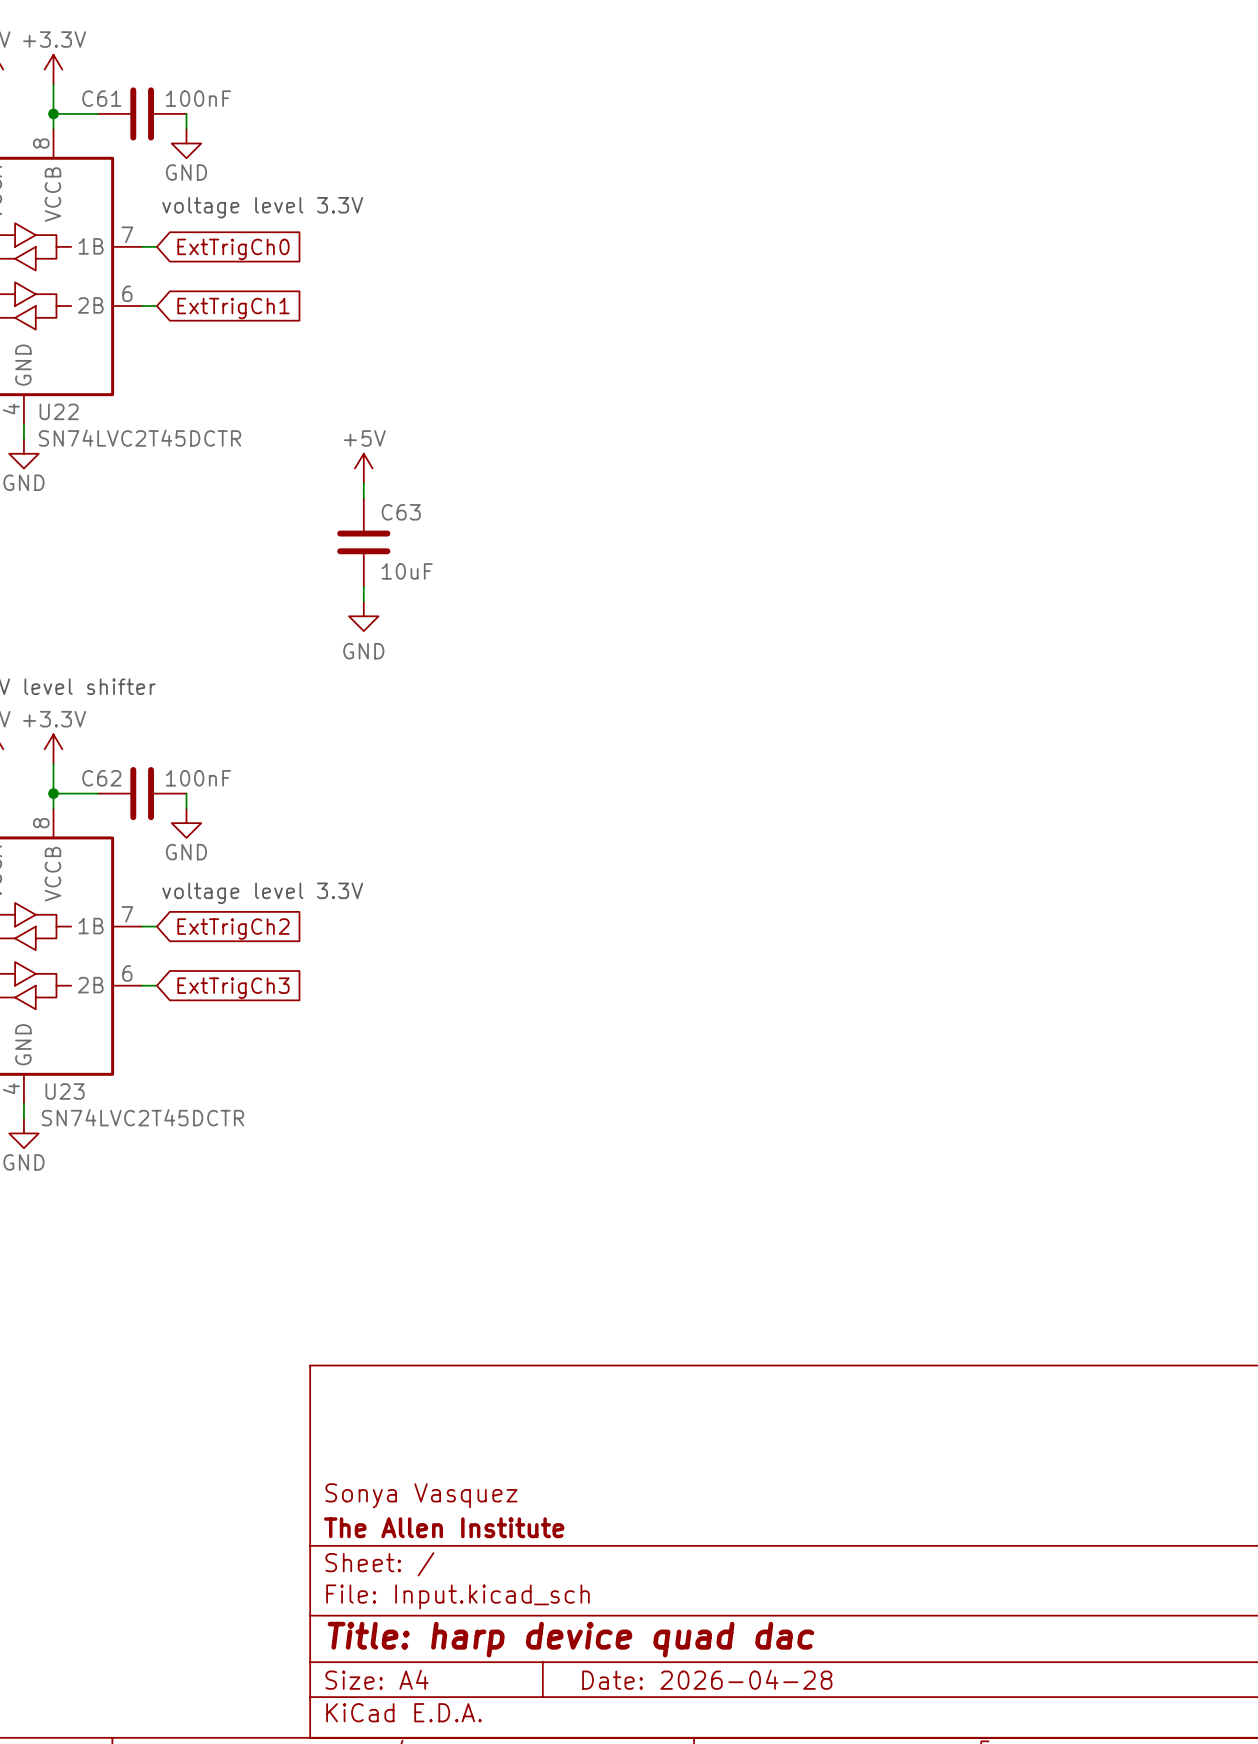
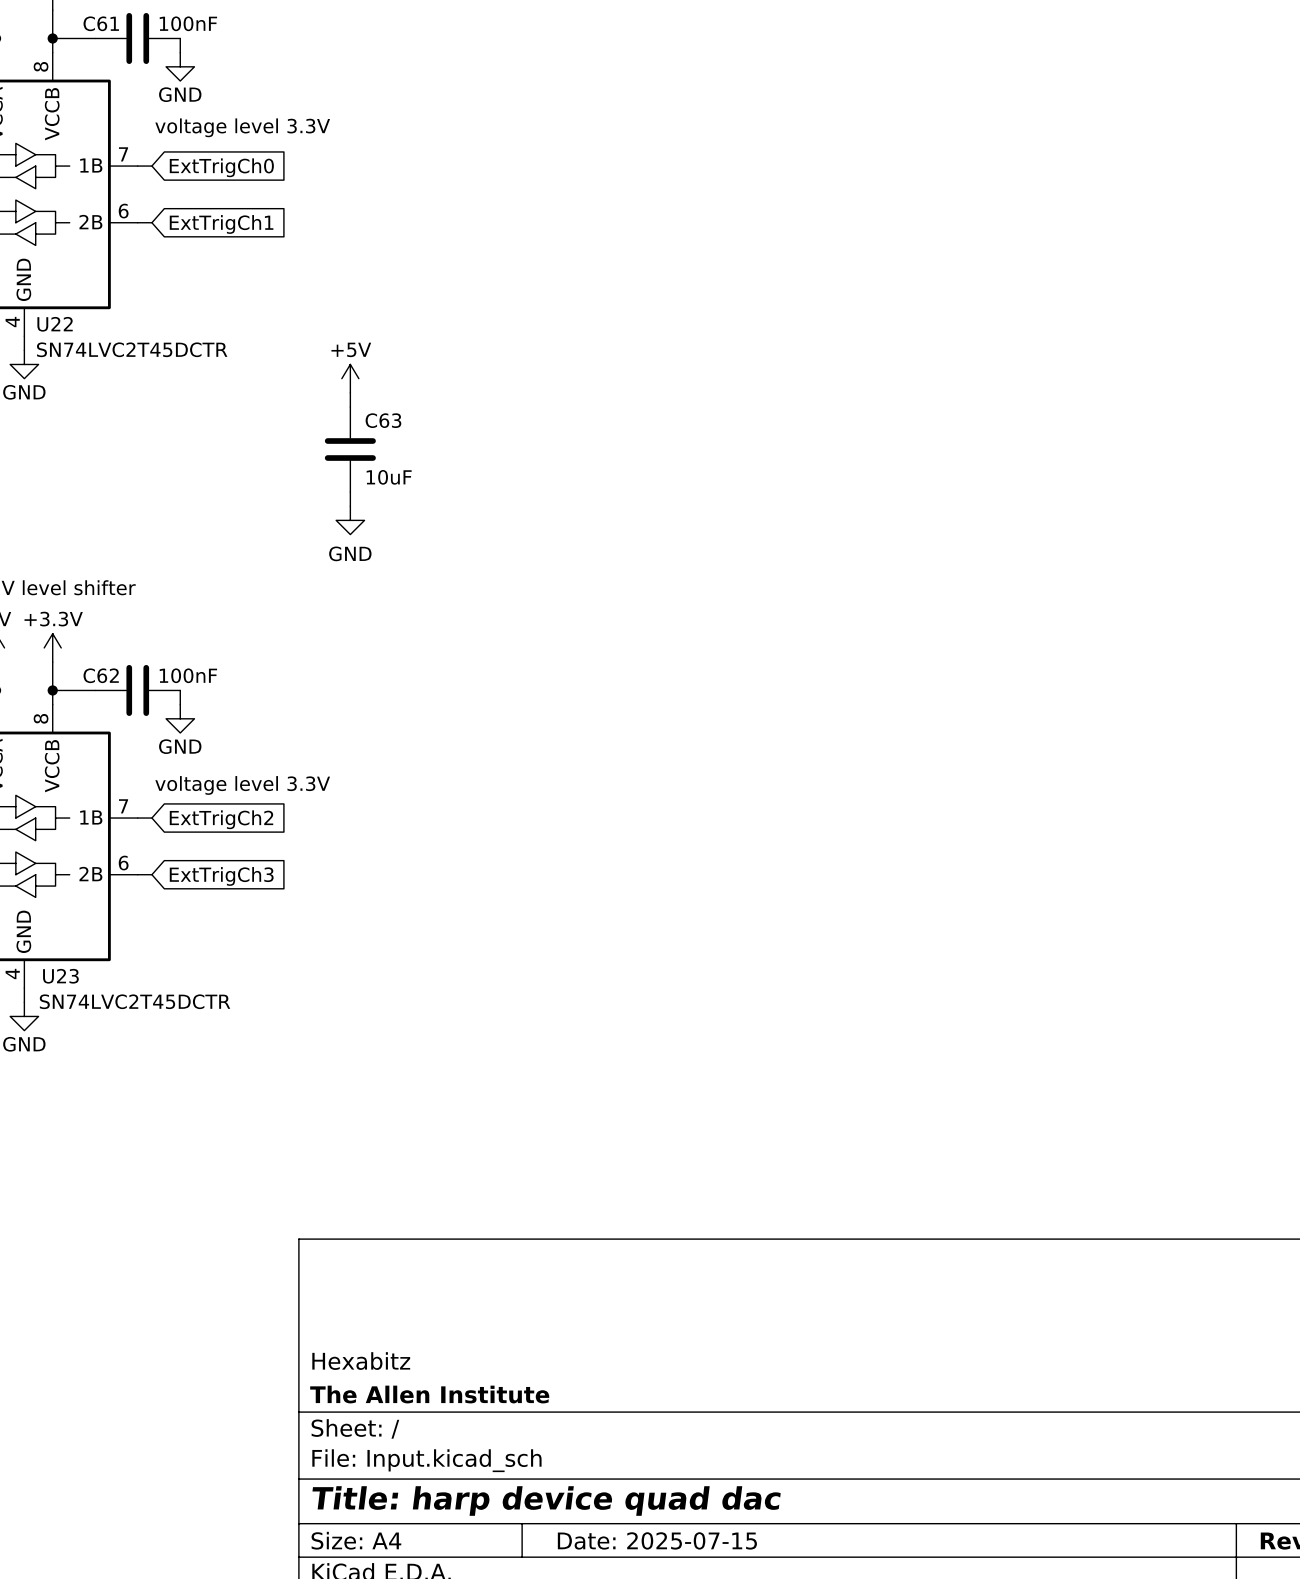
title block: Sonya Vasquez (421, 1495) -> Hexabitz (361, 1361)
title block: Date: 2026-04-28 (707, 1679) -> Date: 2025-07-15 (657, 1540)

